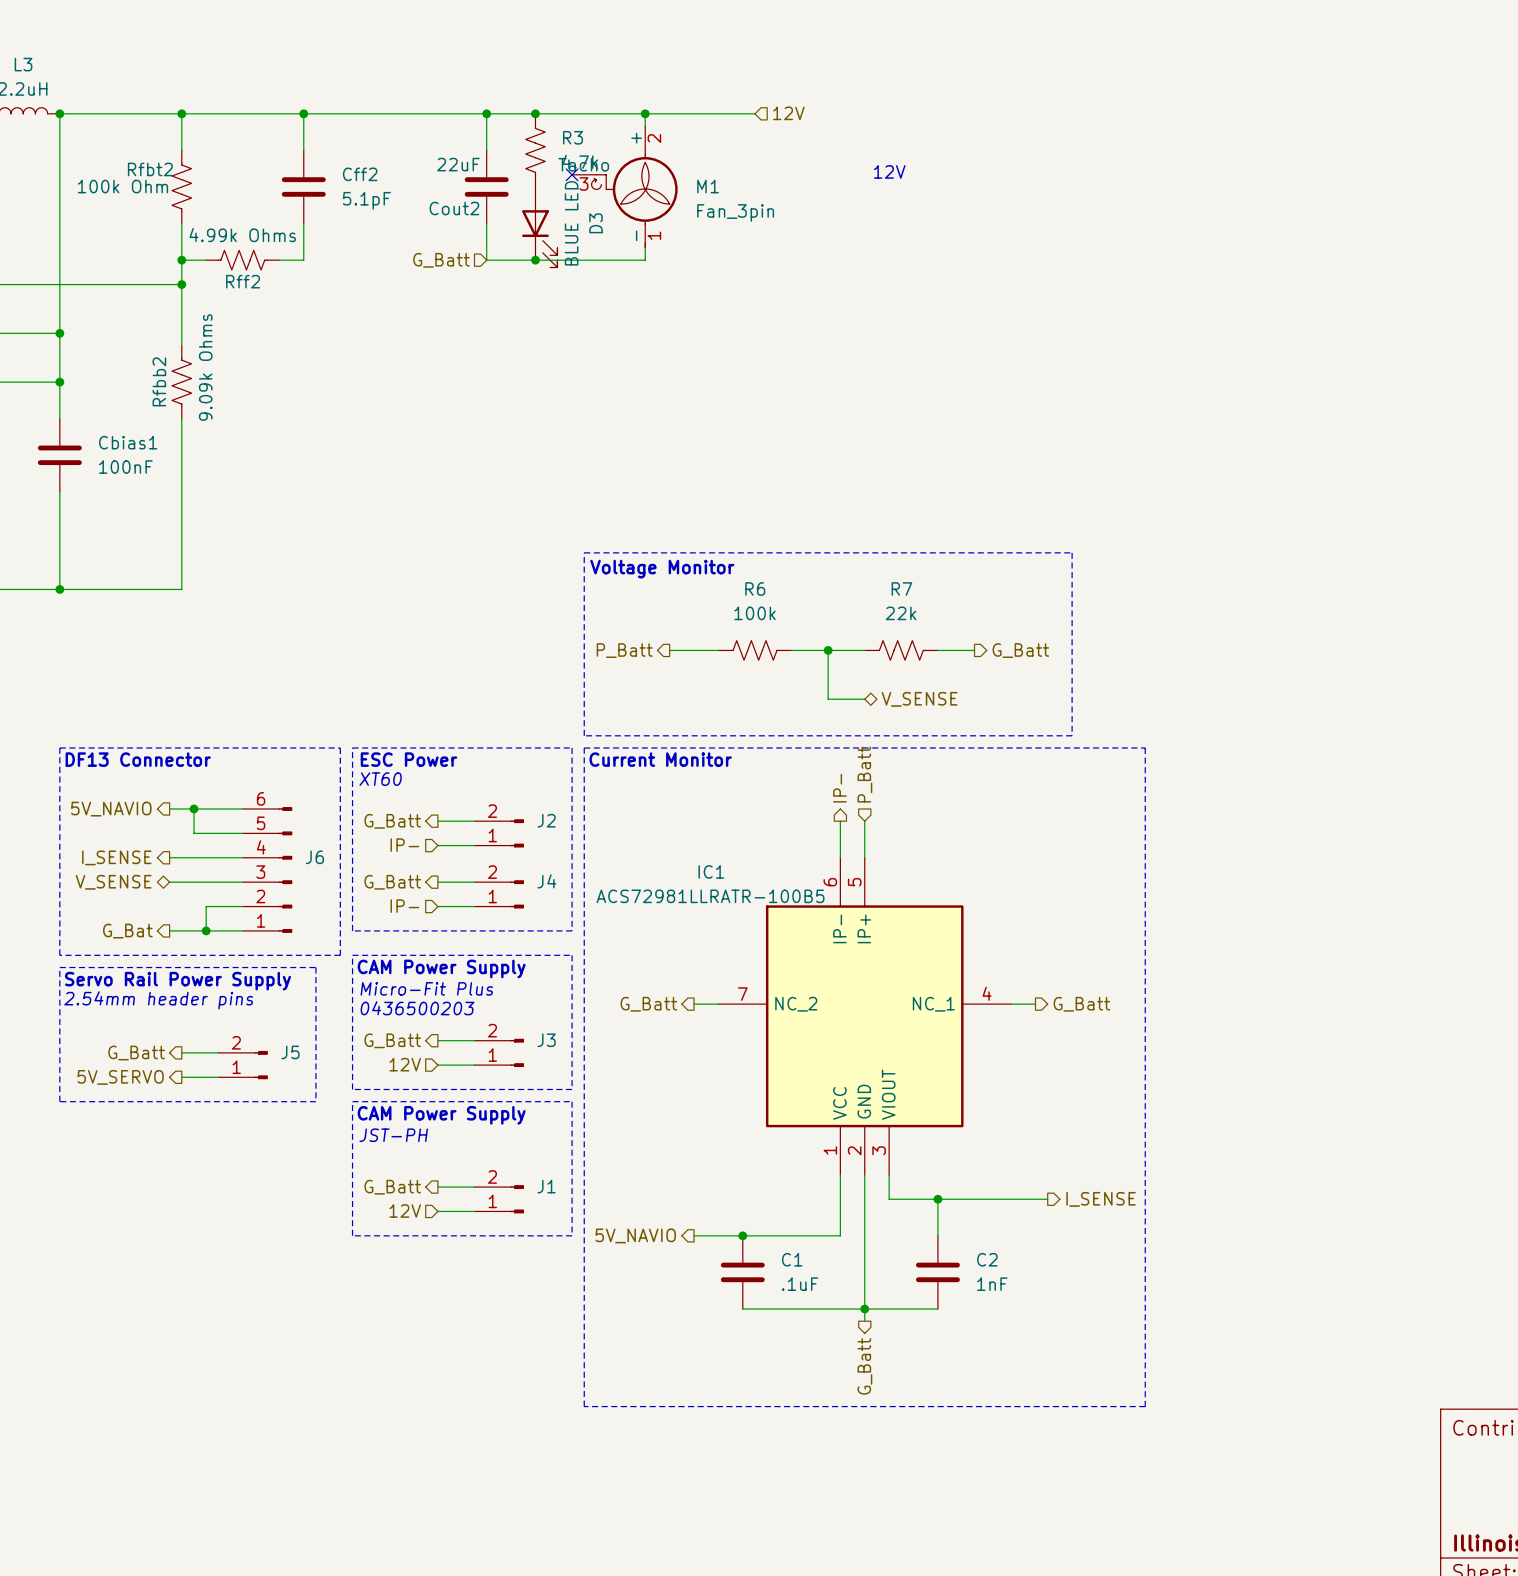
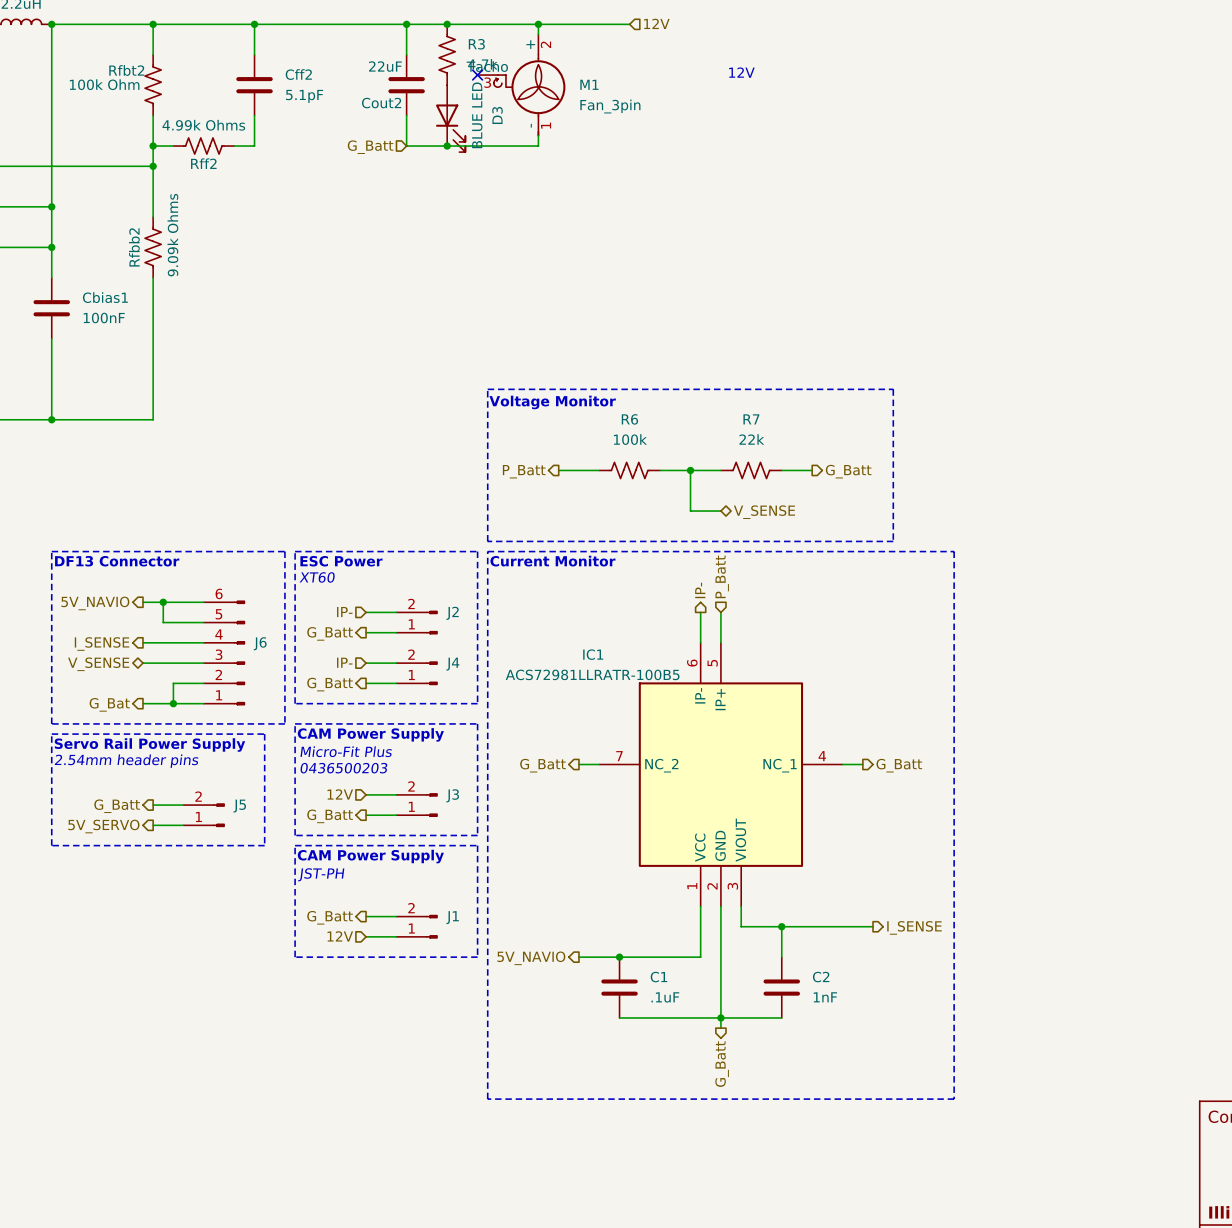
hierarchical label shape: output (392, 821) -> input (344, 612)
hierarchical label: G_Batt (392, 821) -> IP- (344, 612)
hierarchical label shape: input (404, 845) -> output (330, 633)
hierarchical label: IP- (404, 845) -> G_Batt (330, 633)
hierarchical label shape: output (392, 882) -> input (344, 662)
hierarchical label: G_Batt (392, 882) -> IP- (344, 662)
hierarchical label shape: input (404, 906) -> output (330, 684)
hierarchical label: IP- (404, 906) -> G_Batt (330, 684)
hierarchical label shape: output (392, 1040) -> input (340, 794)
hierarchical label: G_Batt (392, 1040) -> 12V (340, 794)
hierarchical label shape: input (405, 1064) -> output (330, 816)
hierarchical label: 12V (405, 1064) -> G_Batt (330, 816)

